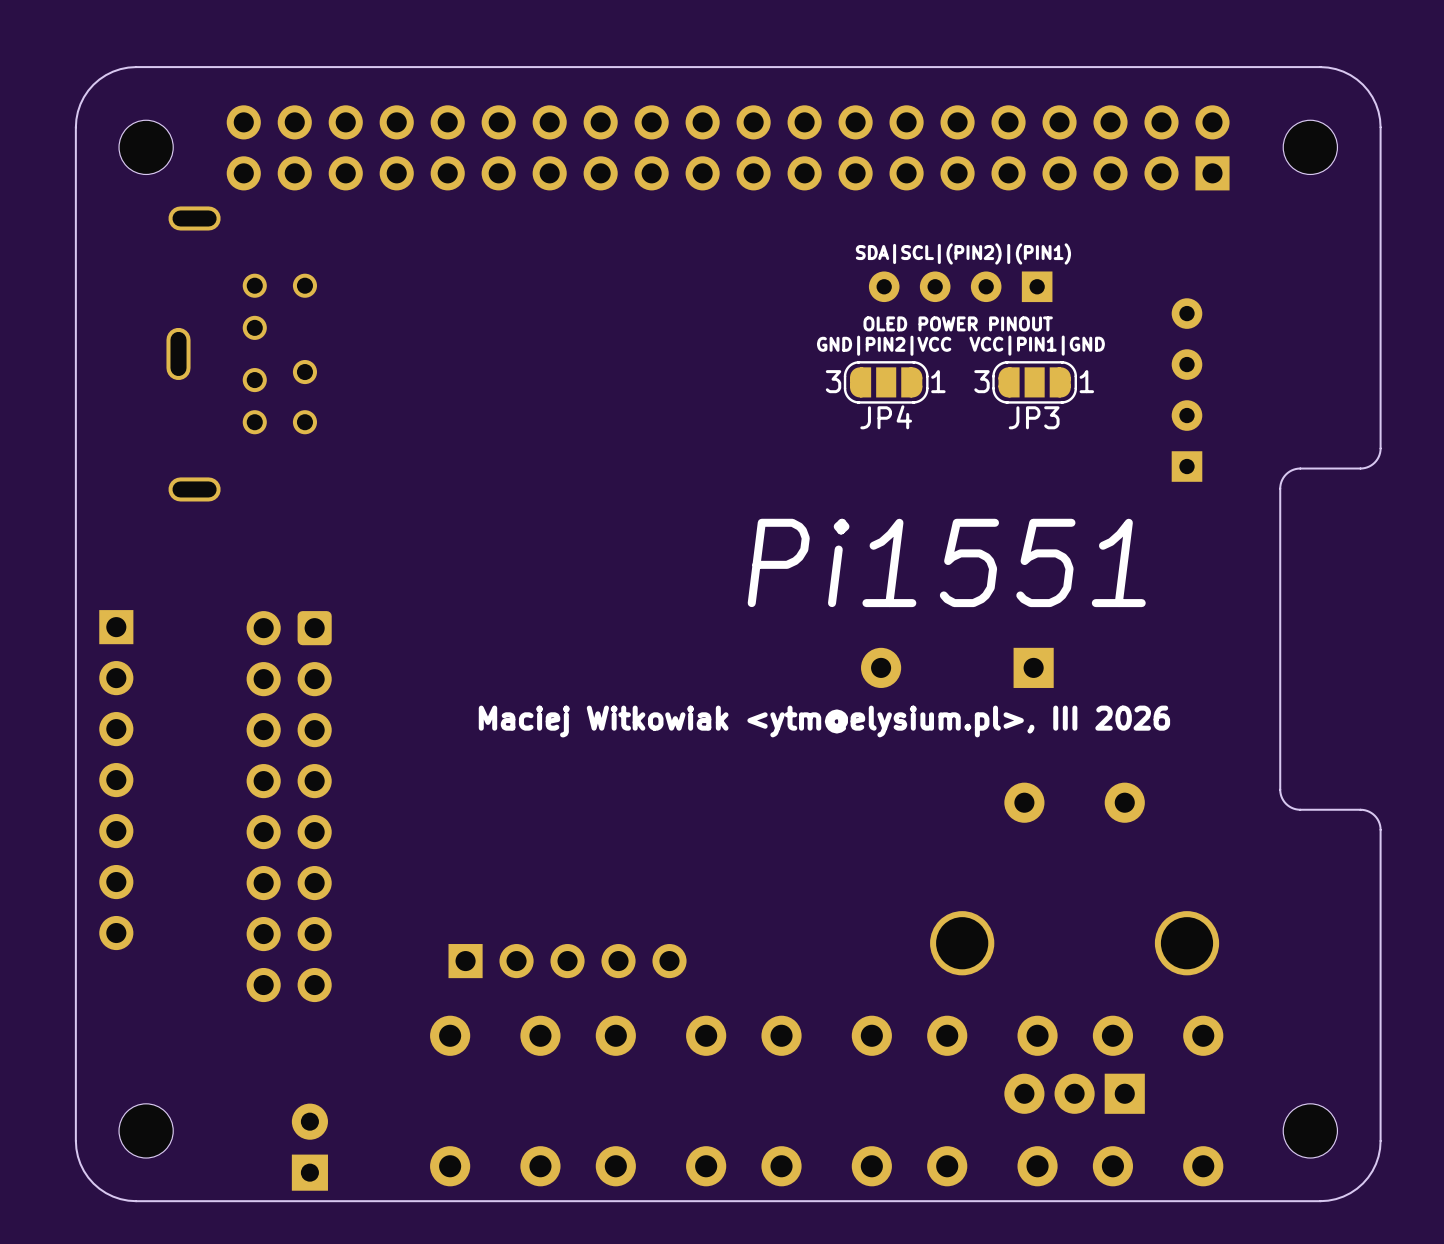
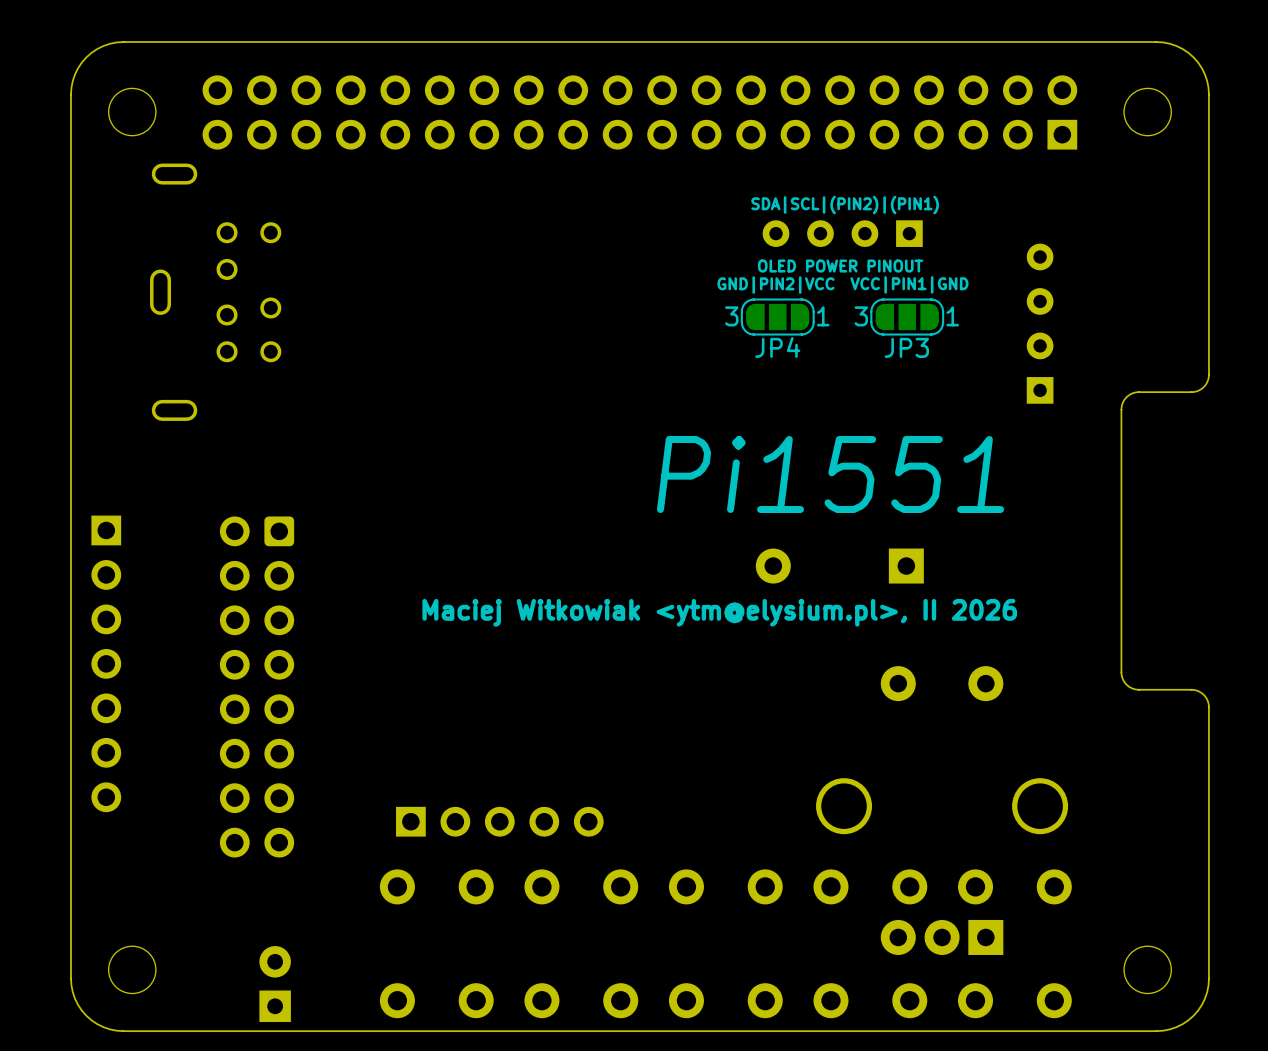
text: Maciej Witkowiak <ytm@elysium.pl>, III 2026 (824, 721) -> Maciej Witkowiak <ytm@elysium.pl>, II 2026 (719, 612)

